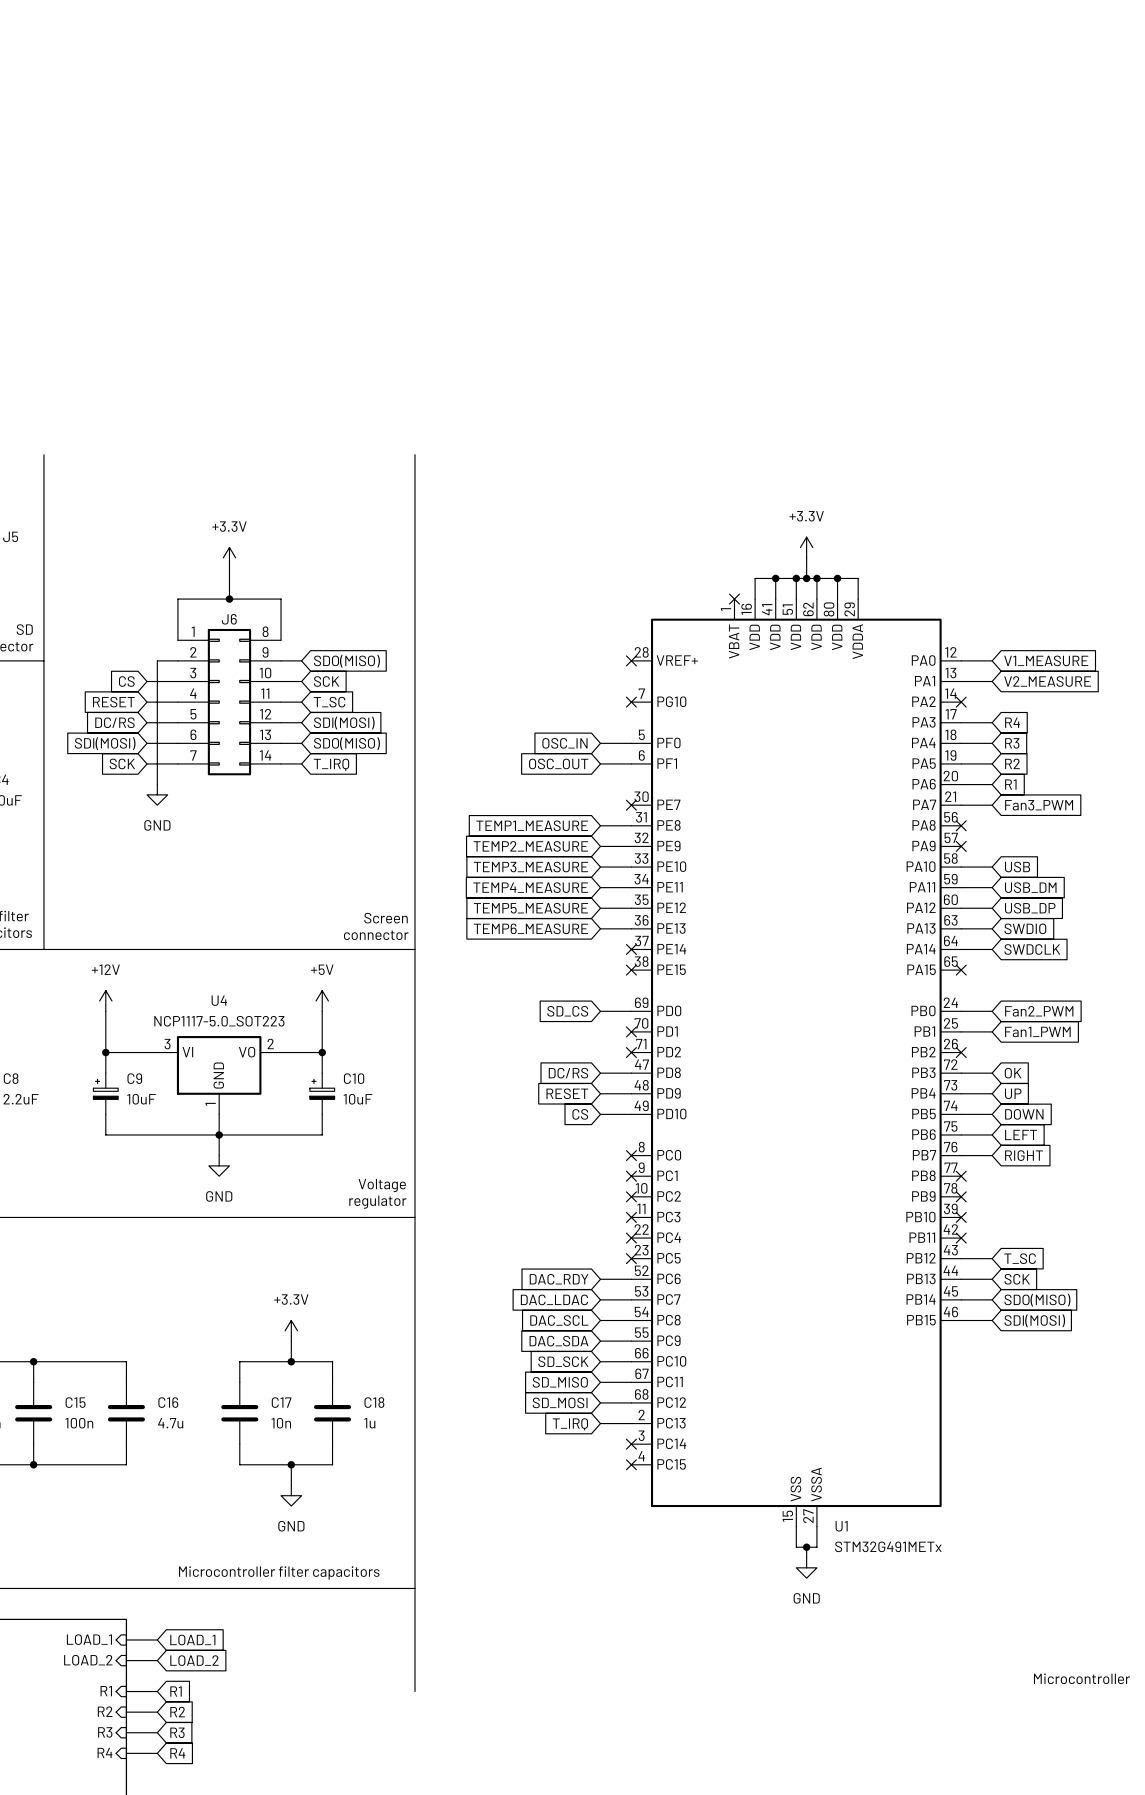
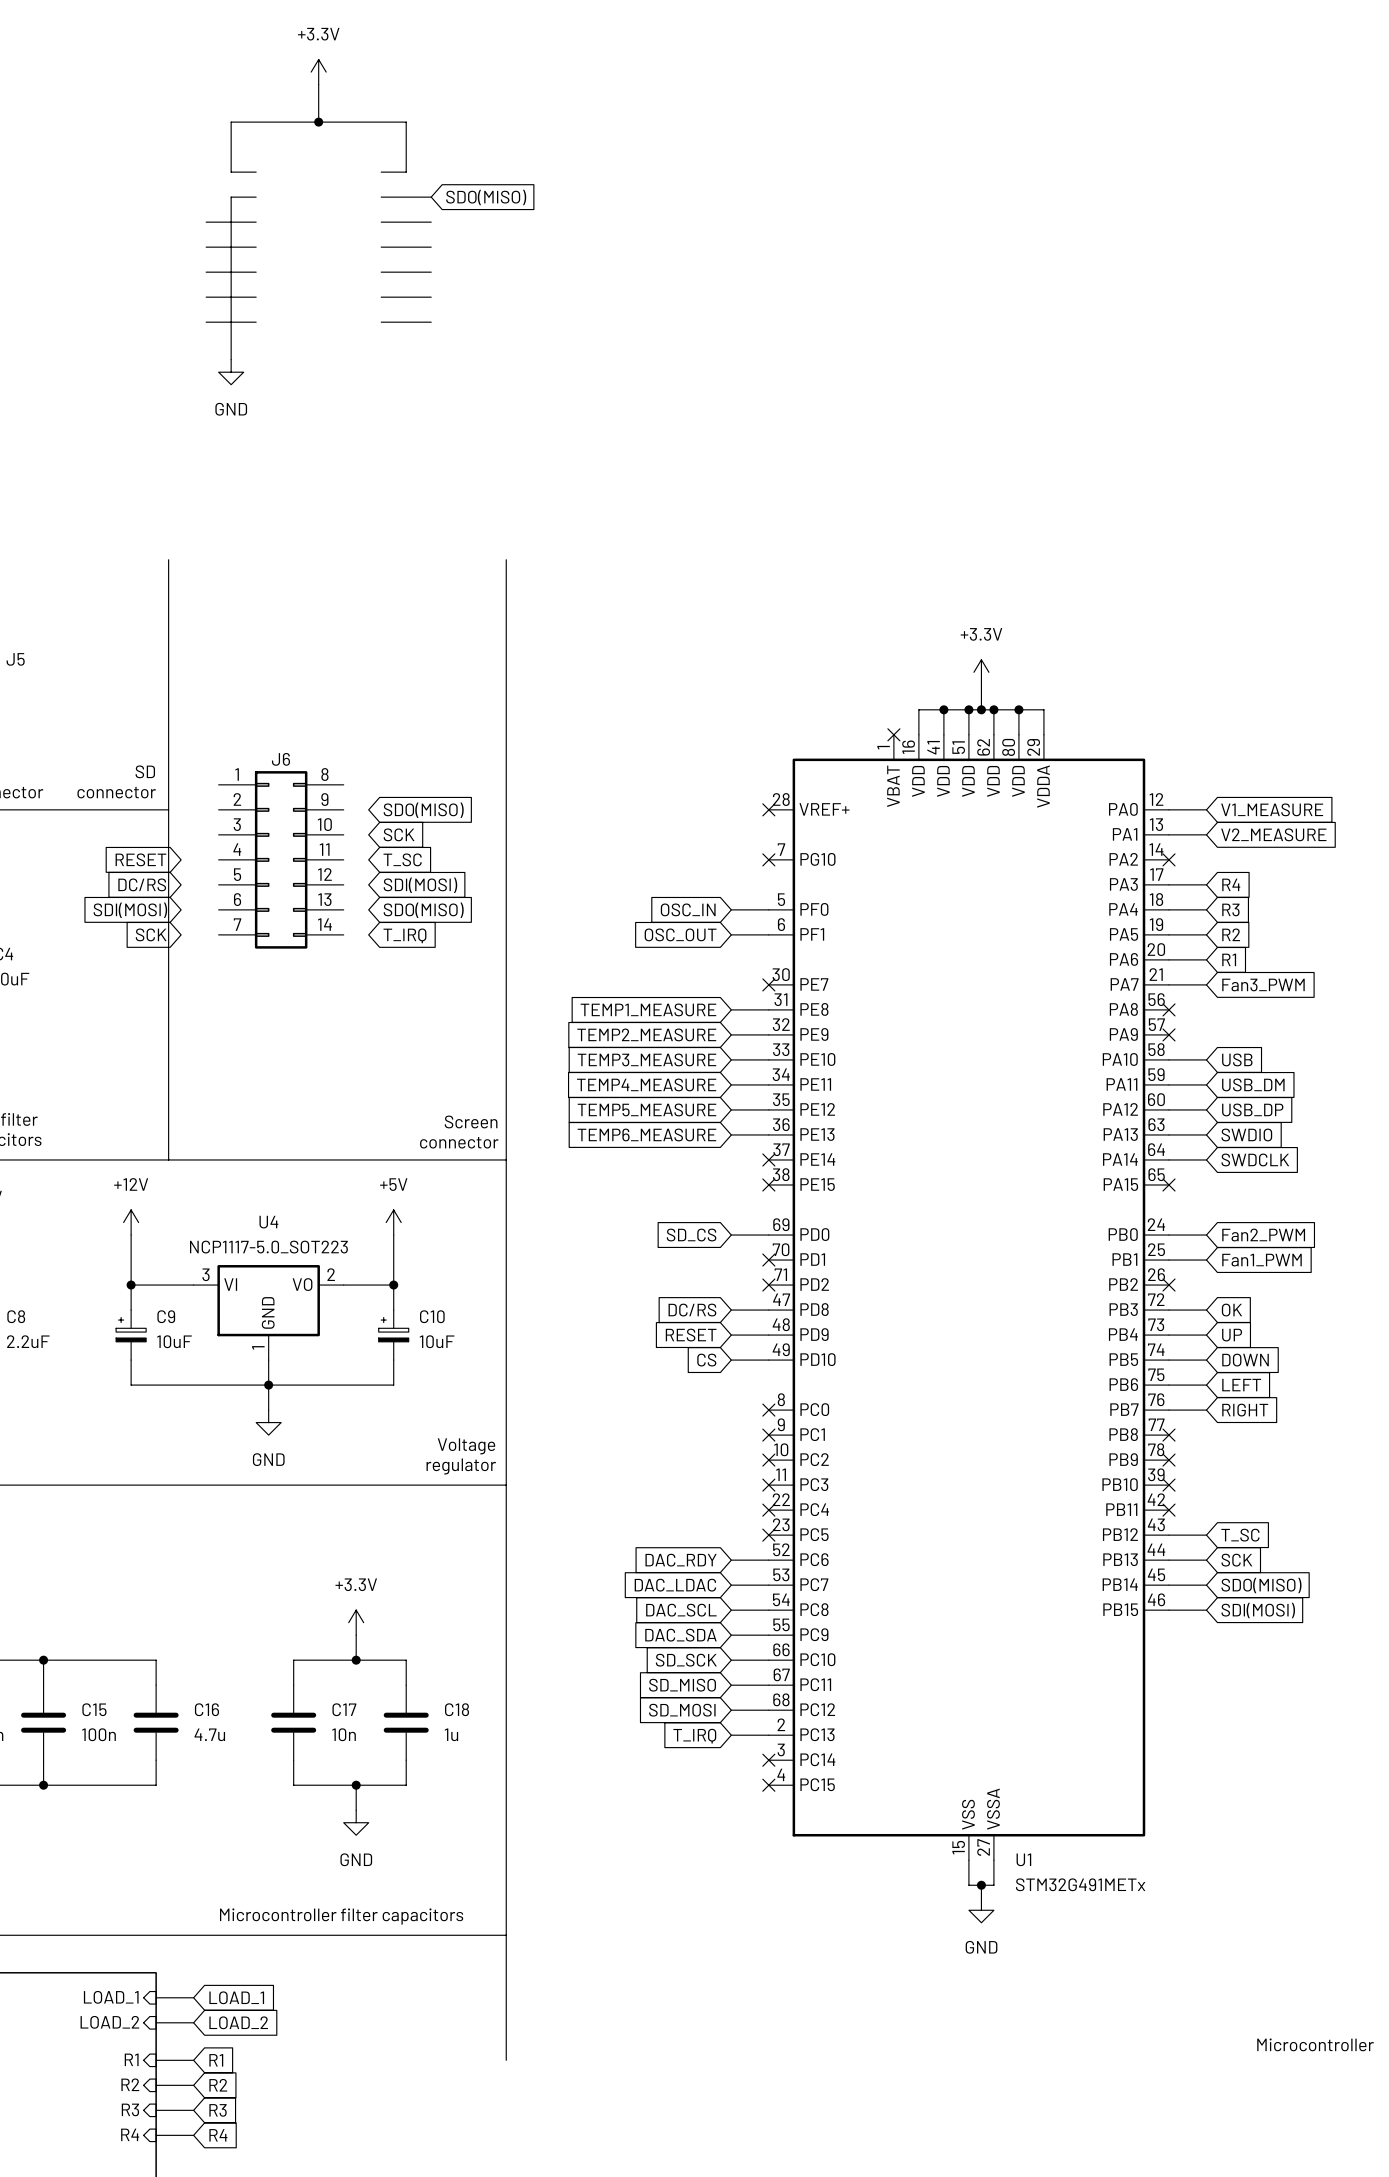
power symbol: none -> +3.3V (318, 72)
wire: none -> (318, 84) (318, 122)
junction: none -> (318, 122)
wire: none -> (256, 172) (231, 172) (231, 122) (406, 122) (406, 172) (381, 172)
wire: none -> (256, 197) (231, 197) (231, 359)
wire: none -> (381, 197) (431, 197)
global label: none -> SDO(MISO) (486, 197)
wire: none -> (206, 222) (256, 222)
wire: none -> (381, 222) (431, 222)
wire: none -> (206, 247) (256, 247)
wire: none -> (381, 247) (431, 247)
wire: none -> (206, 272) (256, 272)
wire: none -> (381, 272) (431, 272)
wire: none -> (206, 297) (256, 297)
wire: none -> (381, 297) (431, 297)
wire: none -> (206, 322) (256, 322)
wire: none -> (381, 322) (431, 322)
power symbol: none -> GND (231, 372)
line: (43, 454) (43, 949) -> (168, 559) (168, 1159)
power symbol: +3.3V (229, 557) -> none
wire: (229, 568) (229, 599) -> none
junction: (229, 599) -> none
text position: SD (24, 629) -> SD (145, 771)
wire: (177, 640) (177, 599) (281, 599) (281, 640) -> none
text: none -> connector (116, 792)
line: none -> (56, 809) (168, 809)
wire: (177, 660) (157, 660) (157, 784) -> none
wire: (281, 660) (301, 660) -> none
global label: CS (126, 681) -> none
wire: (147, 681) (177, 681) -> none
wire: (281, 681) (301, 681) -> none
wire: (147, 702) (177, 702) -> none
wire: (281, 702) (301, 702) -> none
wire: (147, 722) (177, 722) -> none
wire: (281, 722) (301, 722) -> none
wire: (147, 743) (177, 743) -> none
wire: (281, 743) (301, 743) -> none
wire: (147, 763) (177, 763) -> none
wire: (281, 763) (301, 763) -> none
power symbol: GND (157, 794) -> none

